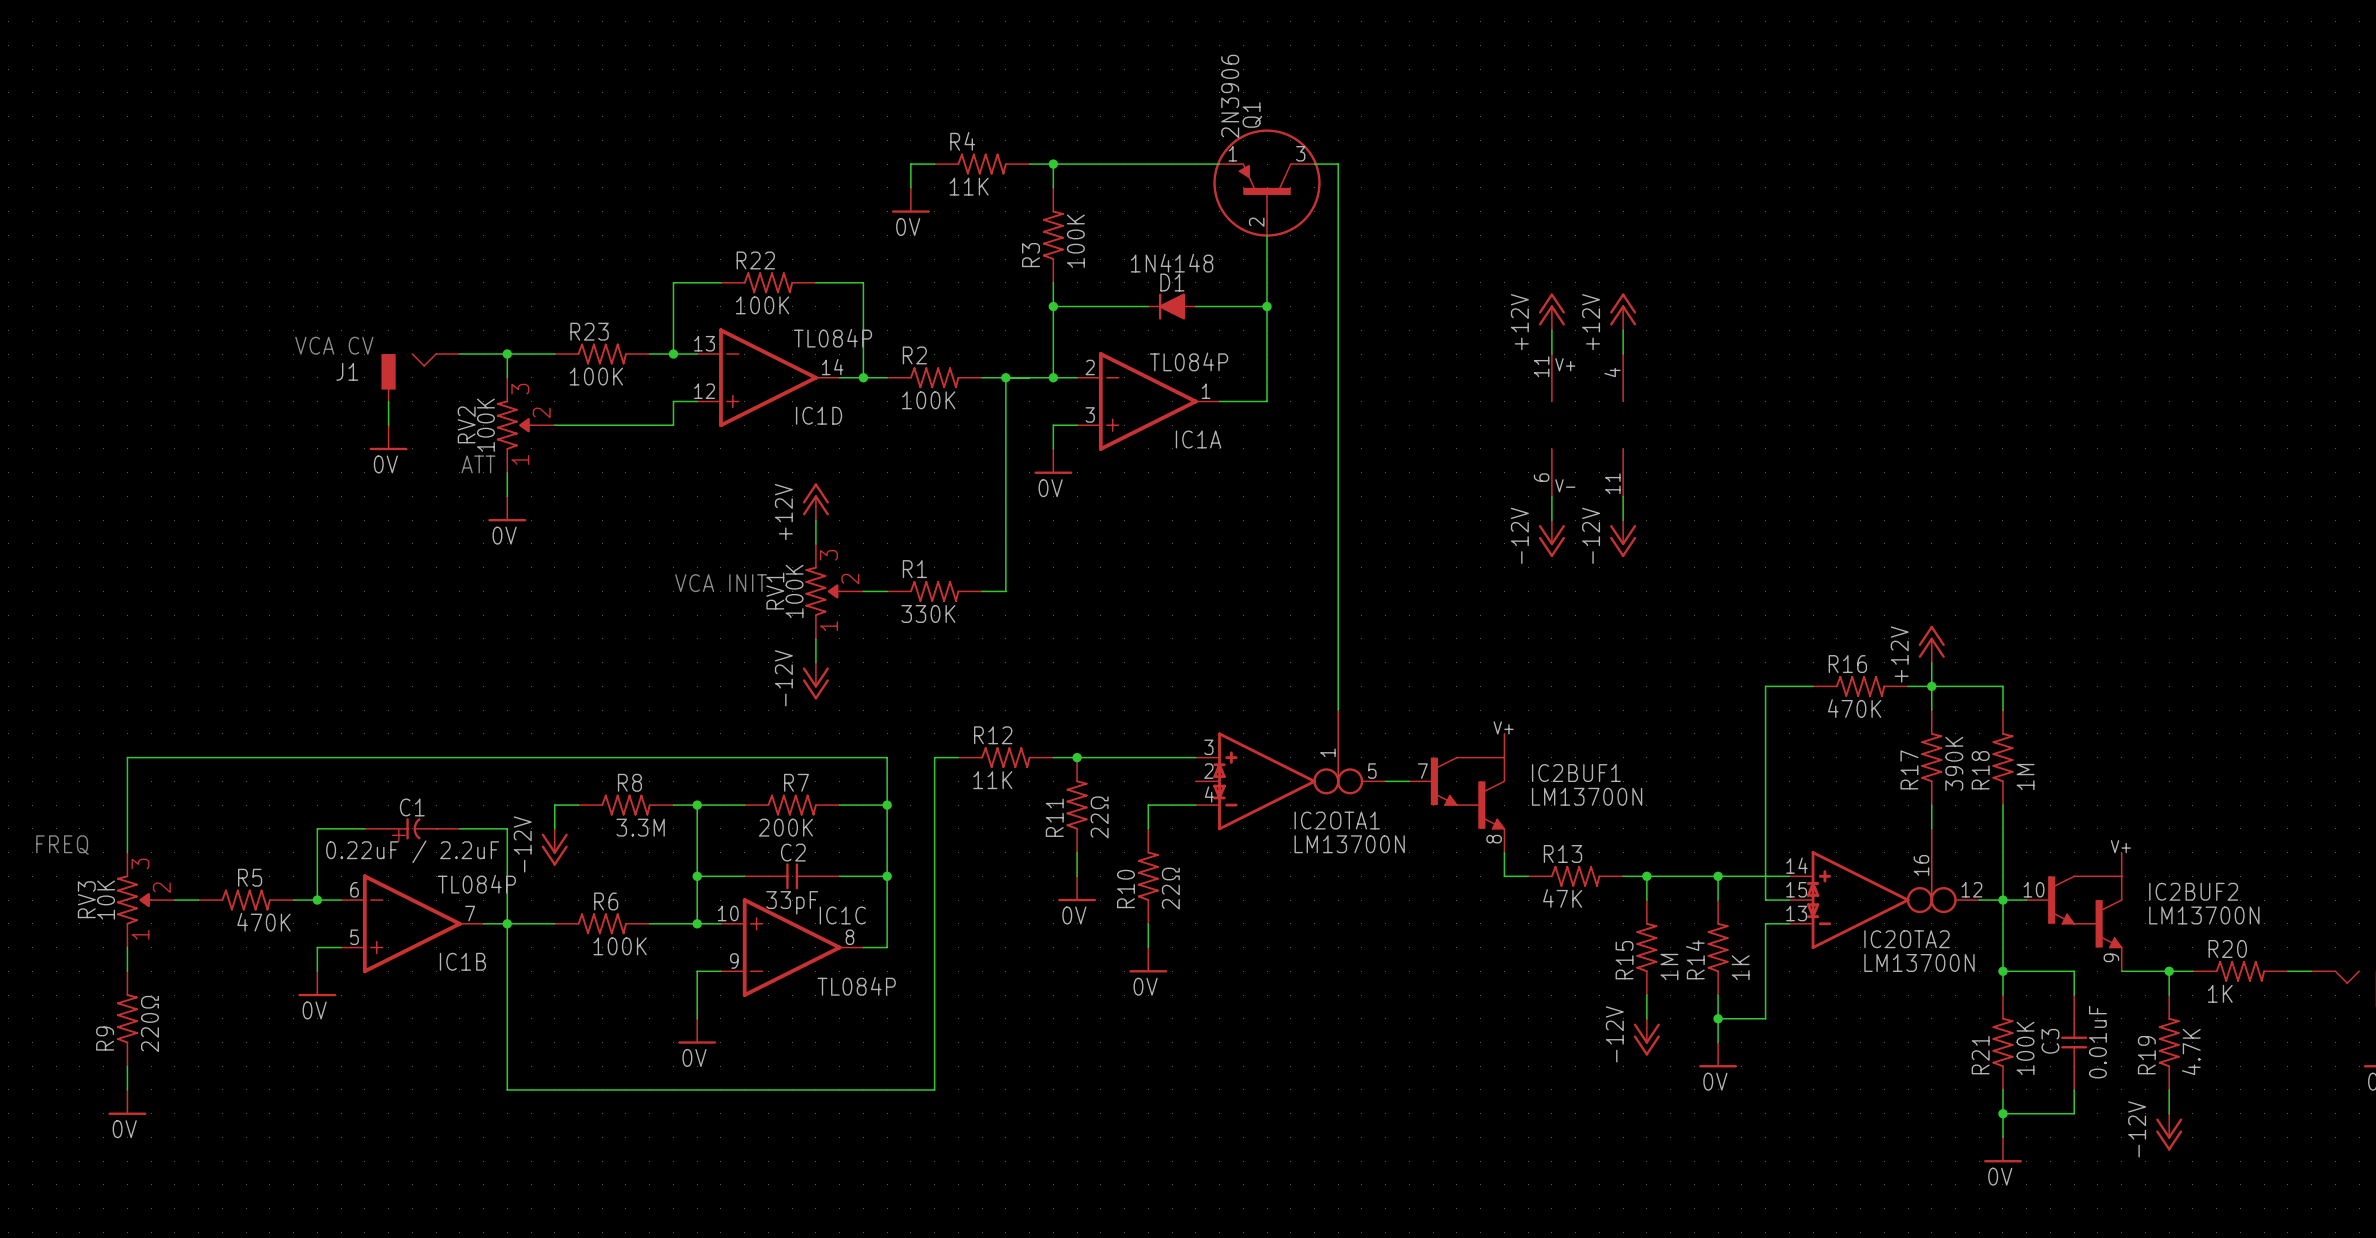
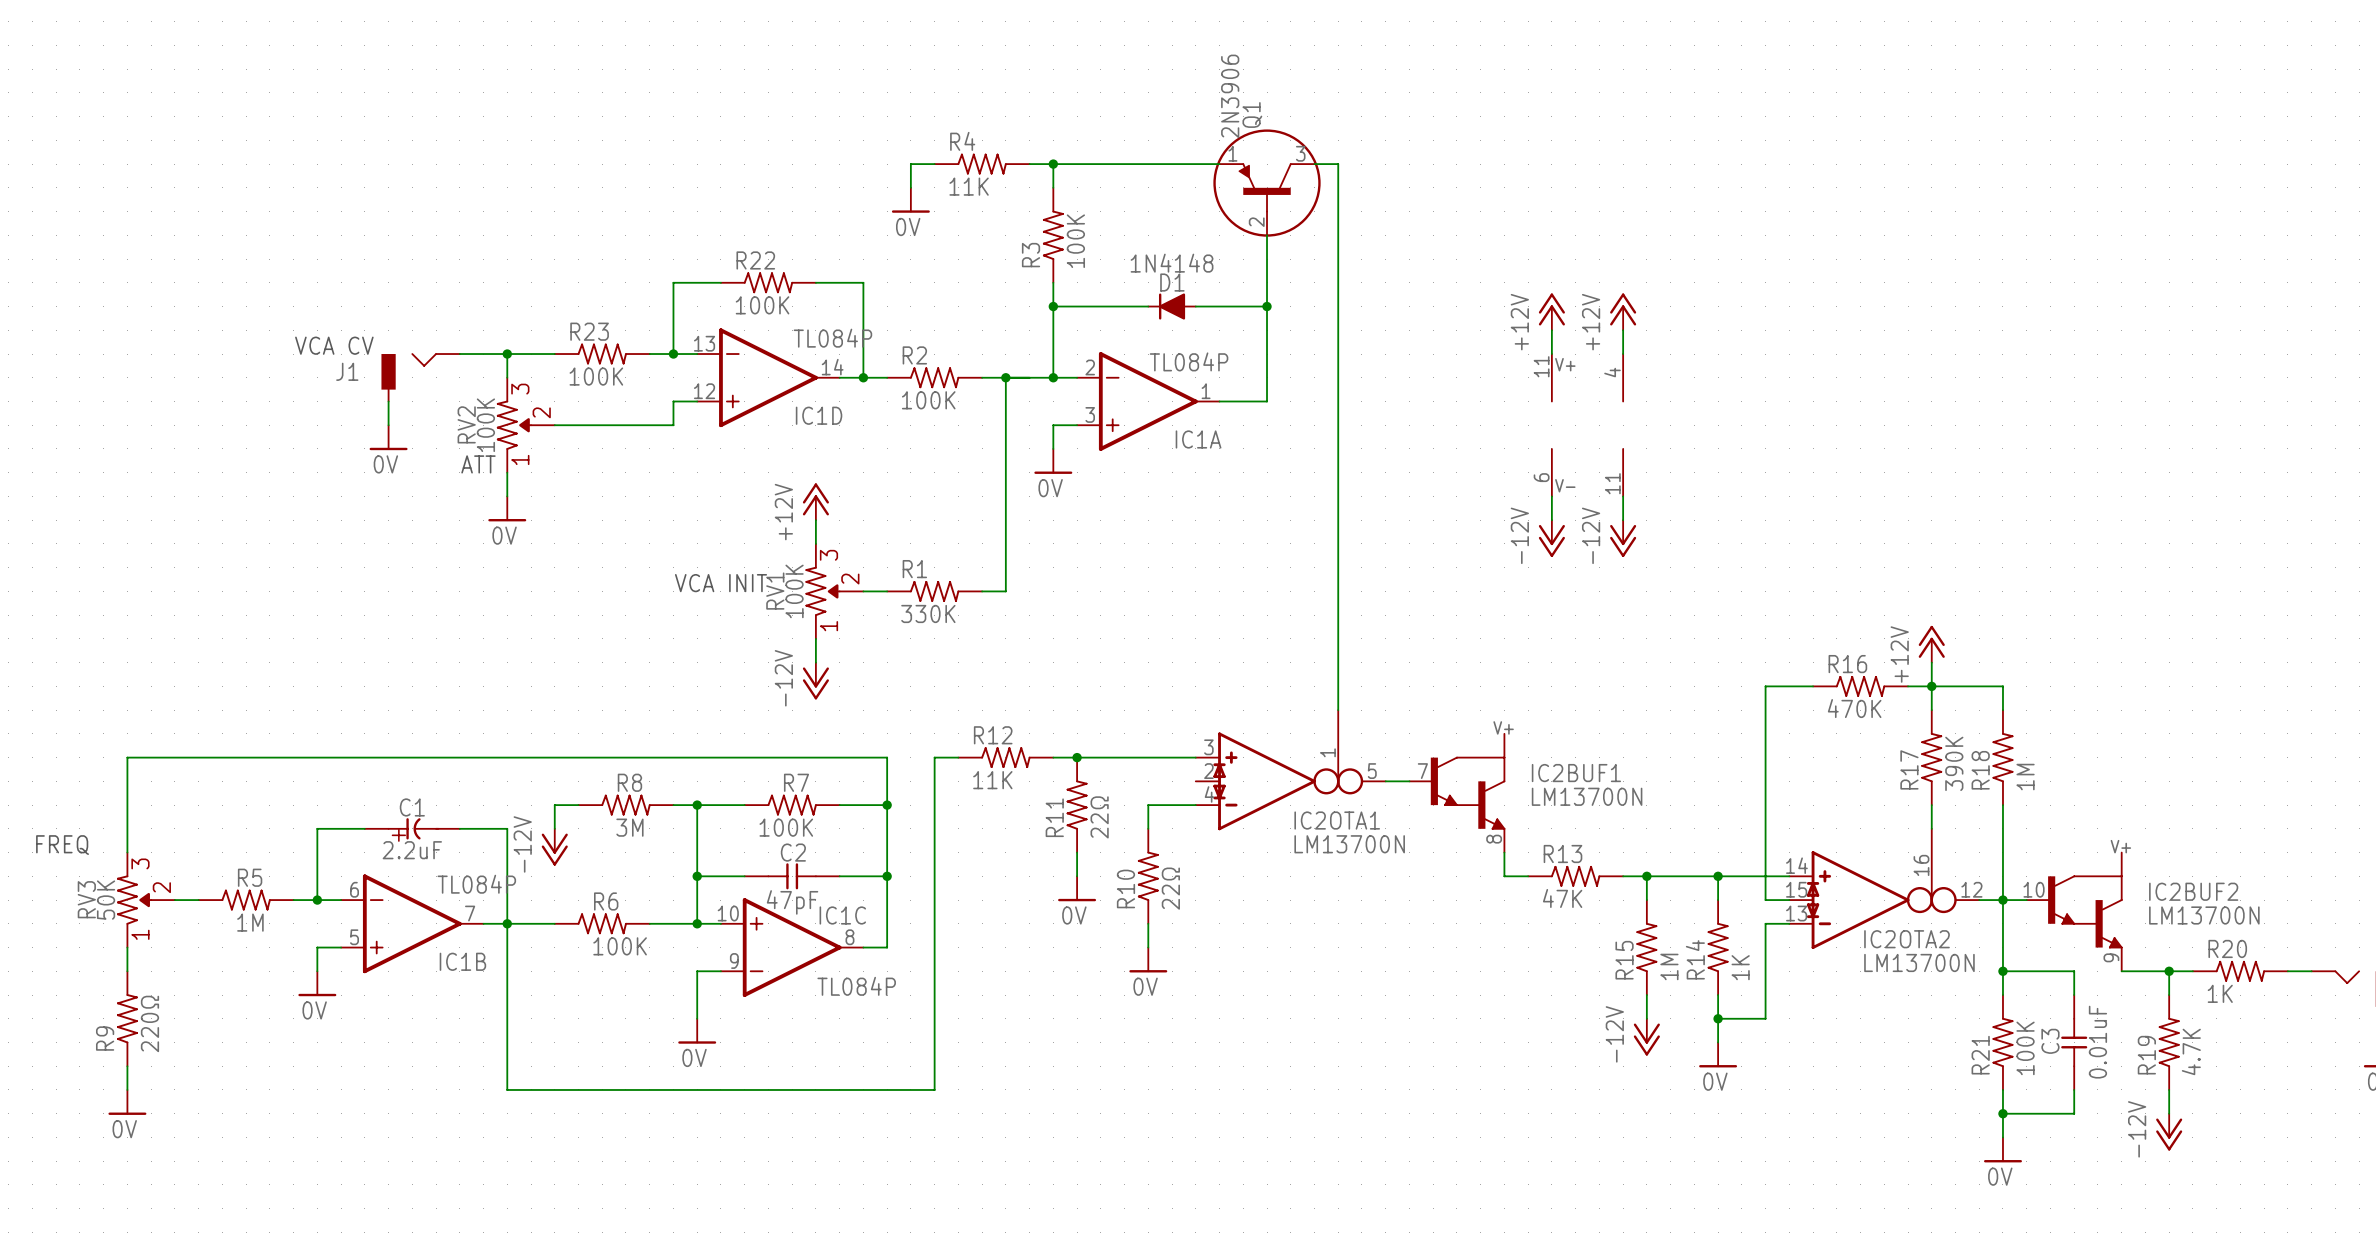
R8 value: 3.3M (640, 827) -> 3M (629, 827)
R7 value: 200K (785, 827) -> 100K (786, 827)
C1 value: 0.22uF / 2.2uF (412, 851) -> 2.2uF (412, 850)
RV3 value: 10K (106, 900) -> 50K (106, 900)
C2 value: 33pF (792, 902) -> 47pF (792, 902)
R5 value: 470K (263, 922) -> 1M (250, 922)

